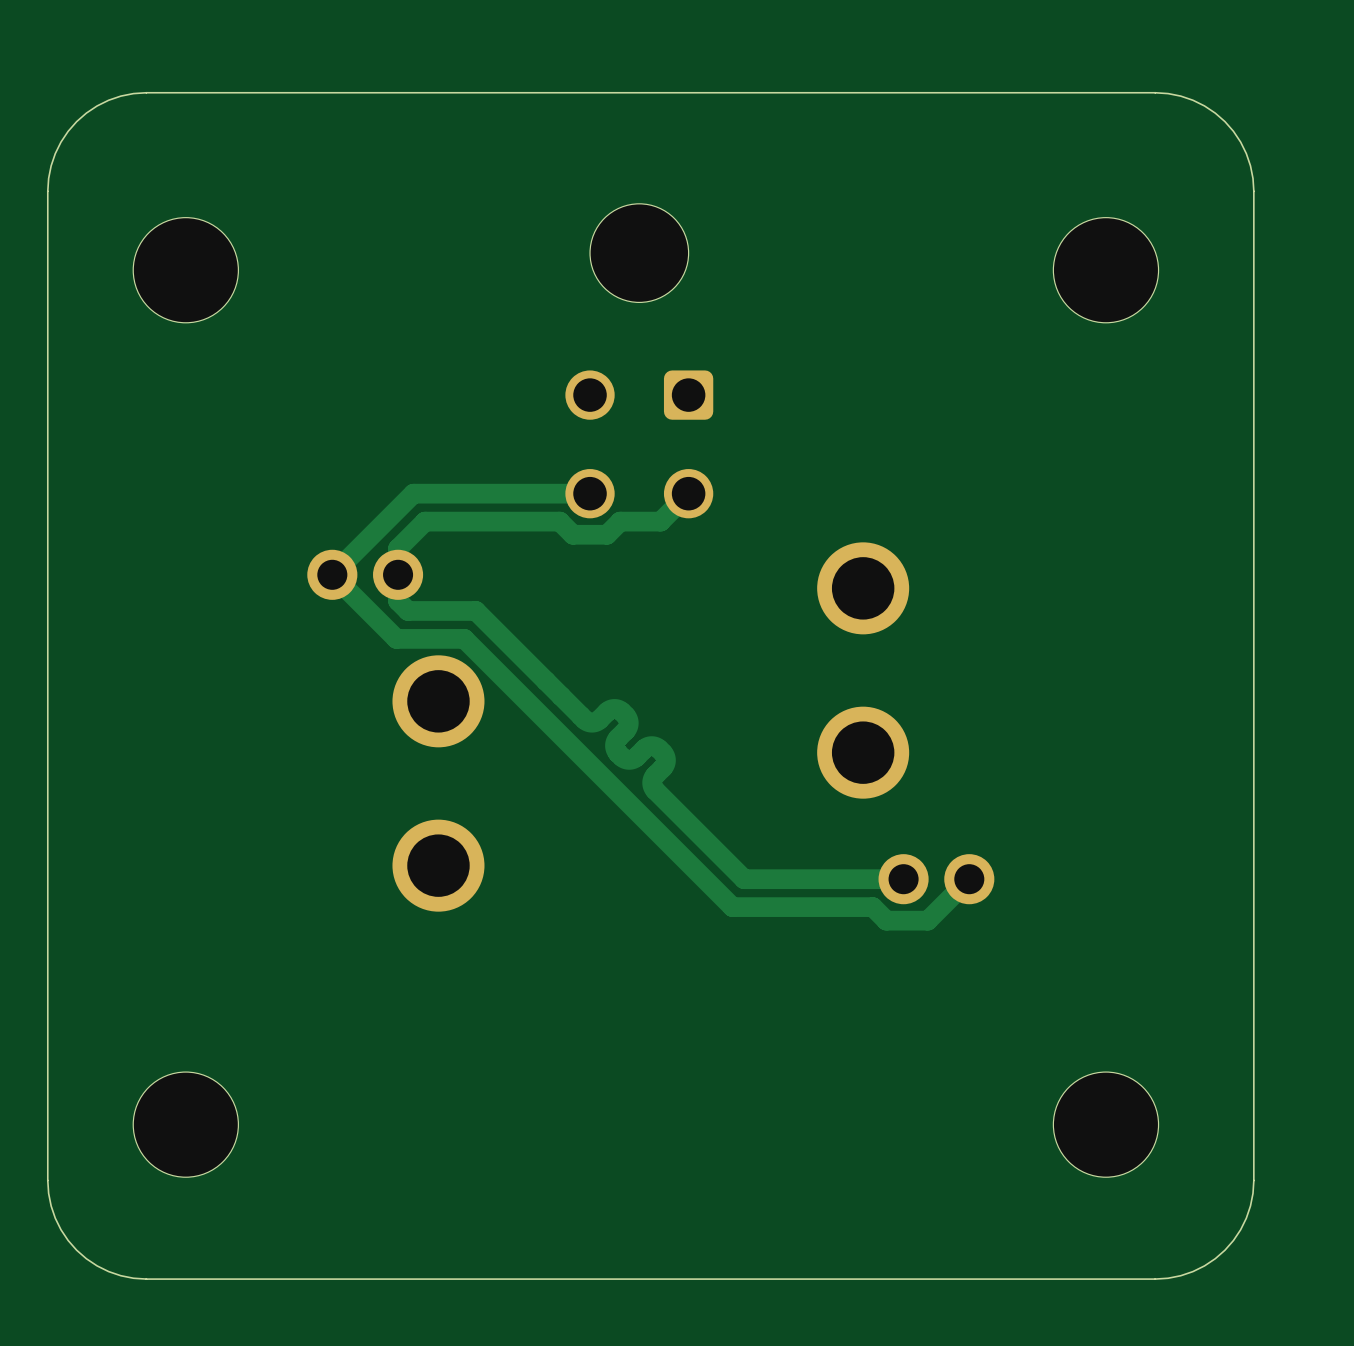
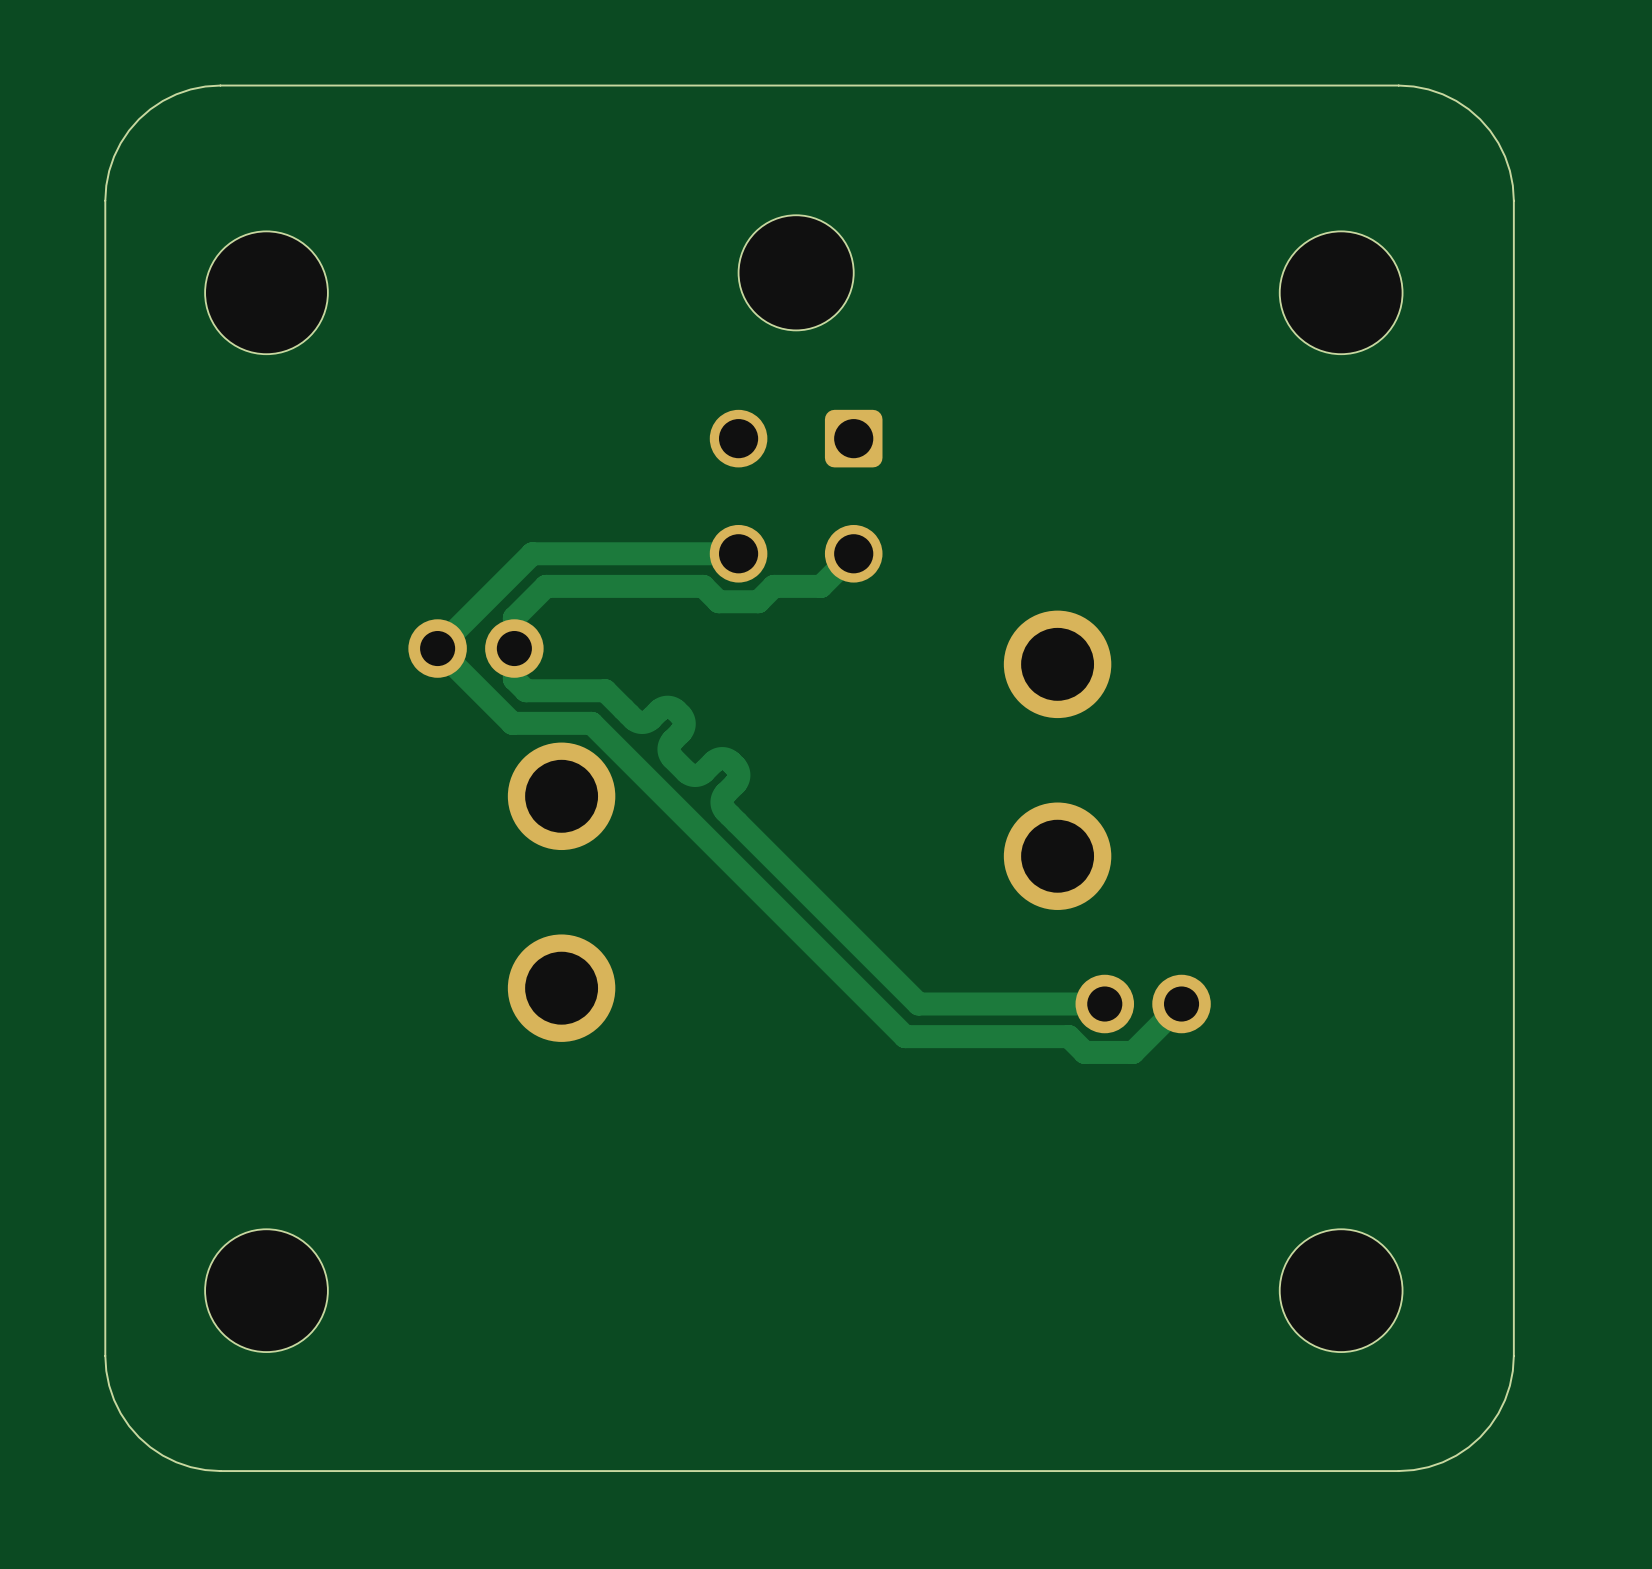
track: (500, 635) (533, 668) -> (633, 718) (639, 722) (646, 721) (660, 709) (666, 707) (673, 708) (680, 715) (683, 721) (683, 727) (669, 746) (669, 752) (672, 757)
track: (545, 680) (578, 713) -> (686, 771) (692, 775) (699, 774) (714, 761) (720, 758) (727, 759) (735, 766) (738, 771) (738, 777) (722, 798) (722, 805) (725, 810)
track: (584, 719) (590, 722) (596, 721) (613, 708) (619, 709) (625, 715) (628, 721) (627, 727) (615, 743) (618, 753) -> (732, 817) (771, 856)
track: (621, 756) (626, 759) (632, 759) (650, 746) (656, 747) (662, 752) (665, 757) (665, 763) (652, 780) (655, 790) -> (775, 861) (814, 900)

